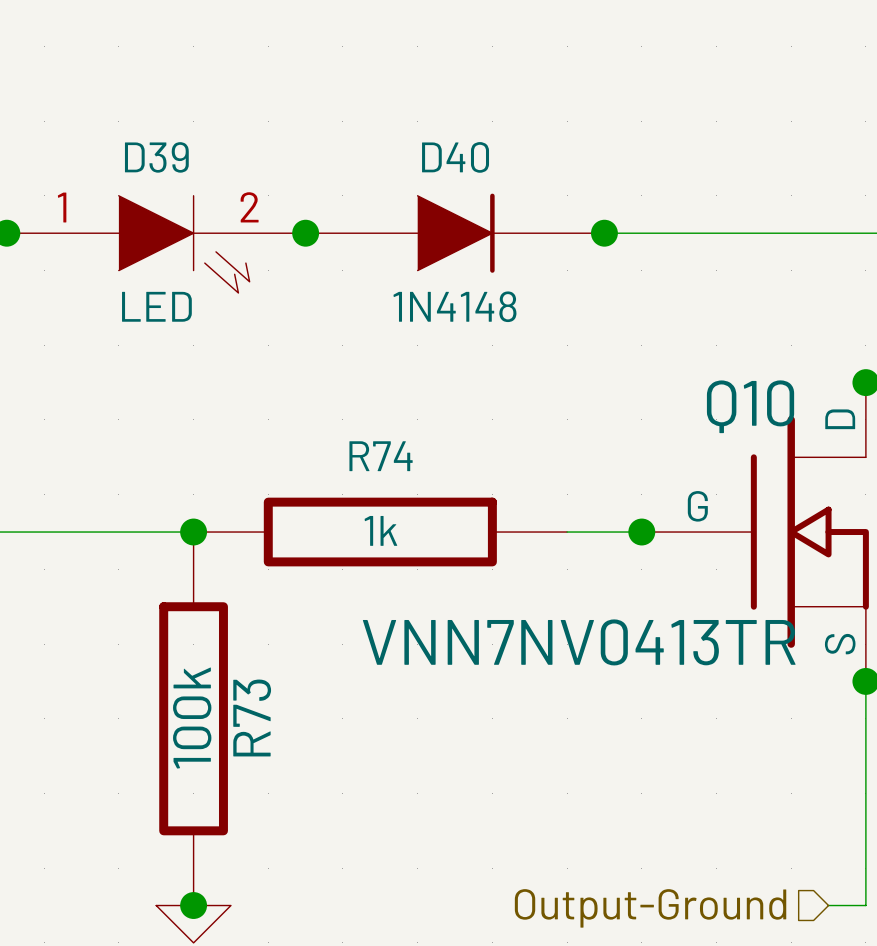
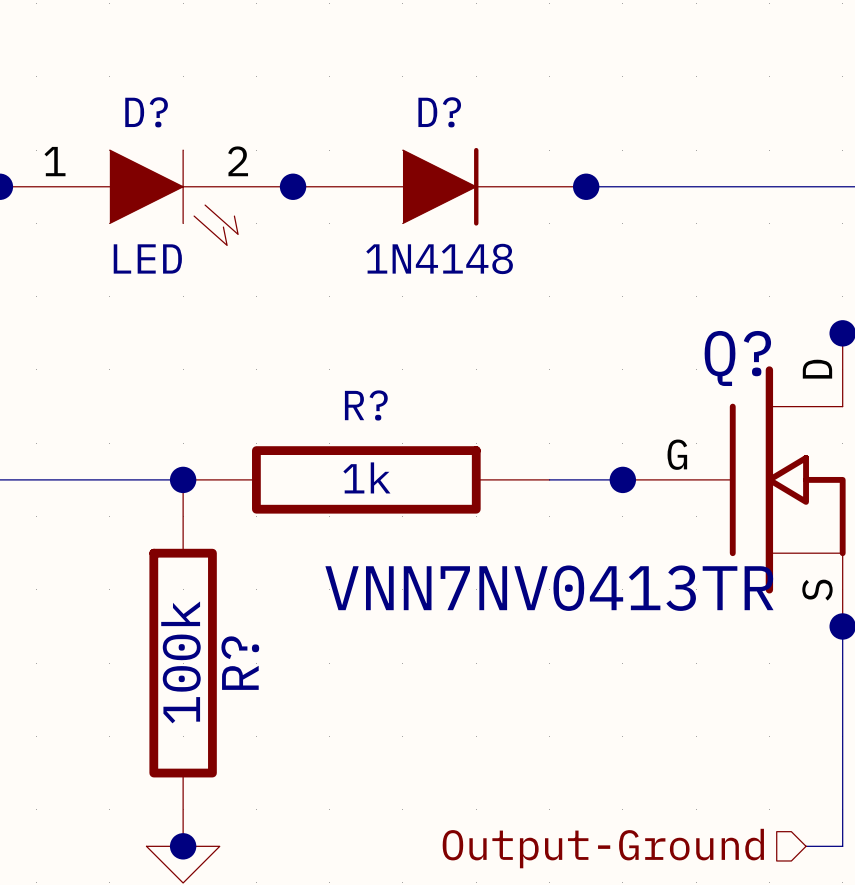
D39 name: D39 (156, 157) -> D? (146, 112)
D40 name: D40 (455, 157) -> D? (439, 112)
Q10 name: Q10 (750, 406) -> Q? (737, 358)
R74 name: R74 (381, 456) -> R? (366, 405)
R73 name: R73 (252, 717) -> R? (240, 663)

